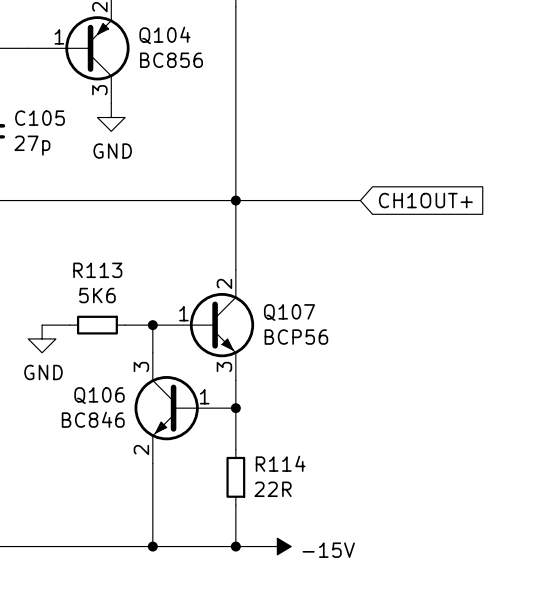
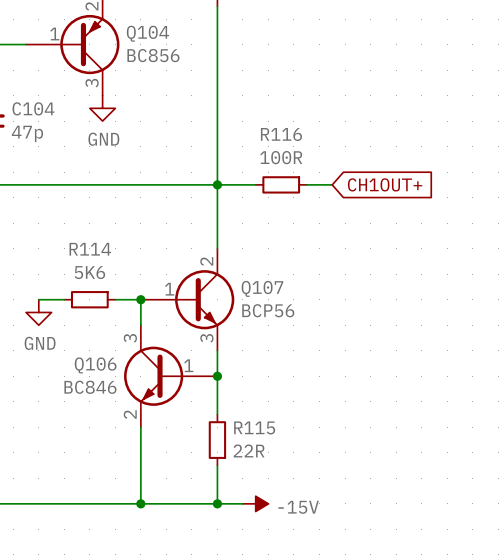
C105 name: C105 (39, 118) -> C104 (33, 108)
C105 value: 27p (32, 145) -> 47p (27, 133)
wire: (277, 200) (332, 200) -> none
R116: none -> 100R (281, 184)
R113 name: R113 (97, 270) -> R114 (90, 249)
R114 name: R114 (280, 463) -> R115 (254, 427)

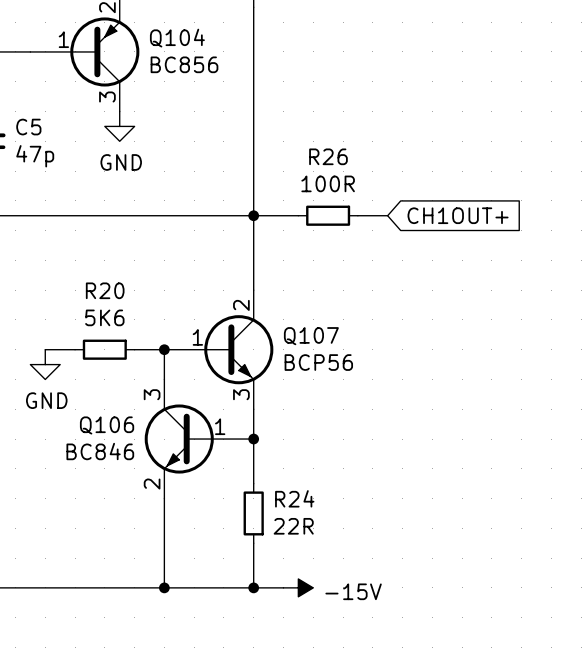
C104 name: C104 (33, 108) -> C5 (28, 127)
R116 name: R116 (281, 134) -> R26 (328, 156)
R114 name: R114 (90, 249) -> R20 (105, 290)
R115 name: R115 (254, 427) -> R24 (294, 498)

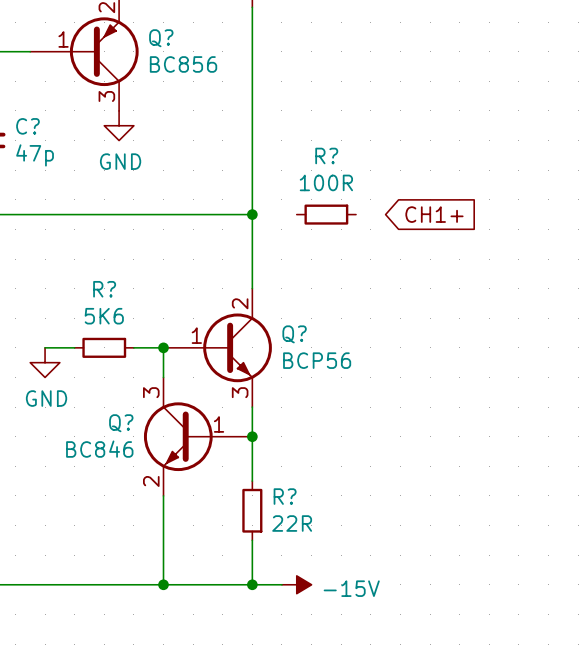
Q104 name: Q104 (177, 38) -> Q? (161, 38)
C5 name: C5 (28, 127) -> C? (27, 126)
R26 name: R26 (328, 156) -> R? (326, 155)
wire: (253, 215) (298, 215) -> none
wire: (357, 215) (387, 215) -> none
global label: CH1OUT+ (458, 215) -> CH1+ (434, 214)
R20 name: R20 (105, 290) -> R? (104, 289)
Q107 name: Q107 (311, 336) -> Q? (294, 334)
Q106 name: Q106 (107, 425) -> Q? (121, 423)
R24 name: R24 (294, 498) -> R? (285, 496)

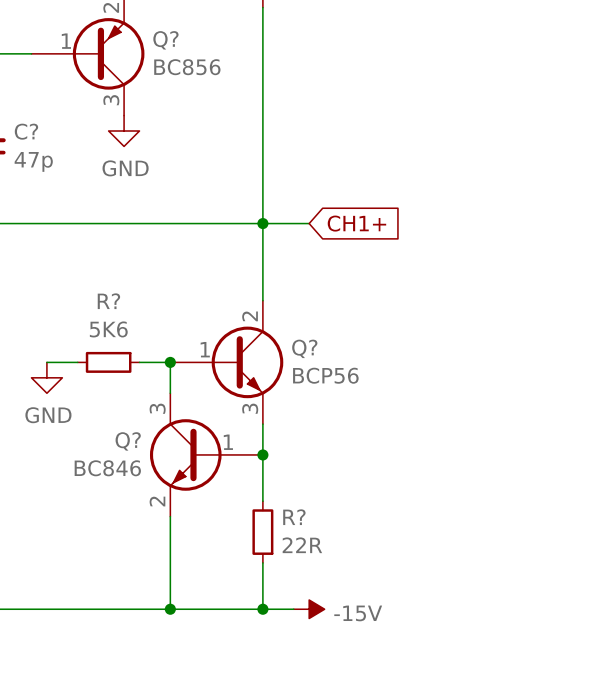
wire: none -> (262, 223) (309, 223)
R?: 100R (326, 214) -> none
global label position: CH1+ (434, 214) -> CH1+ (356, 223)

